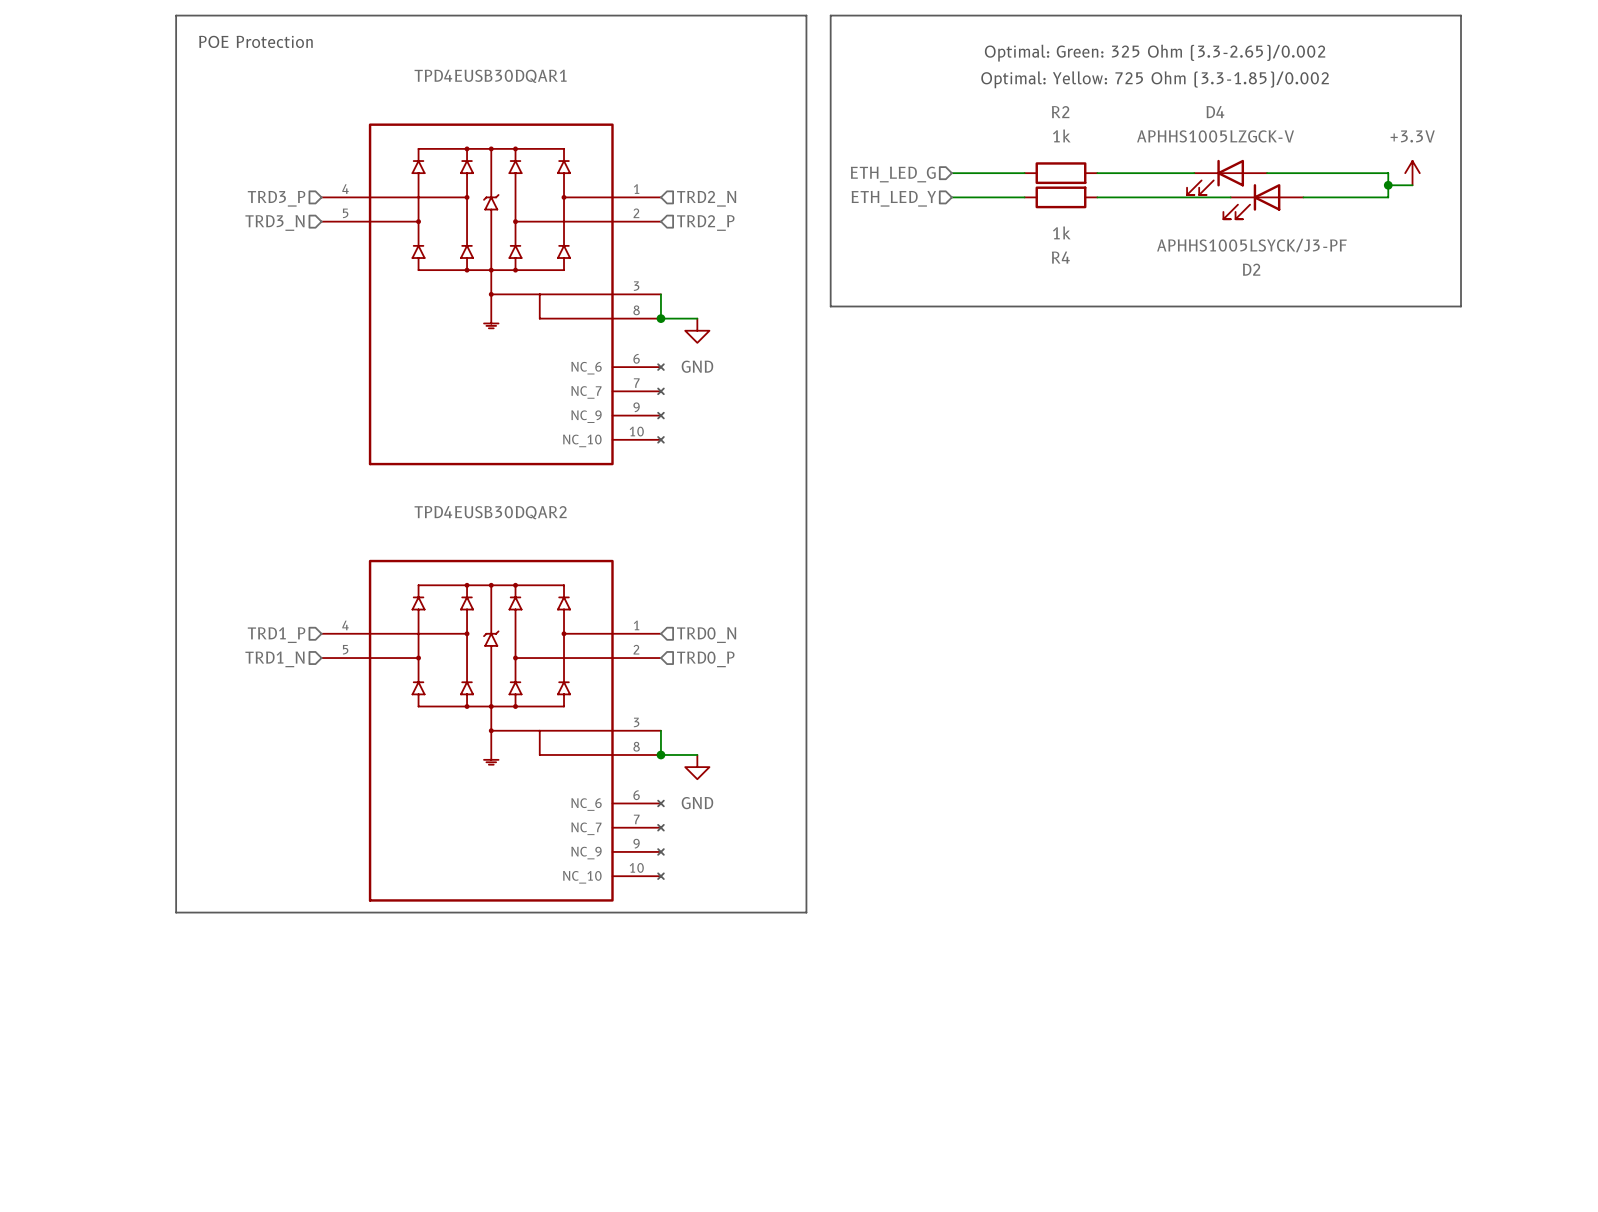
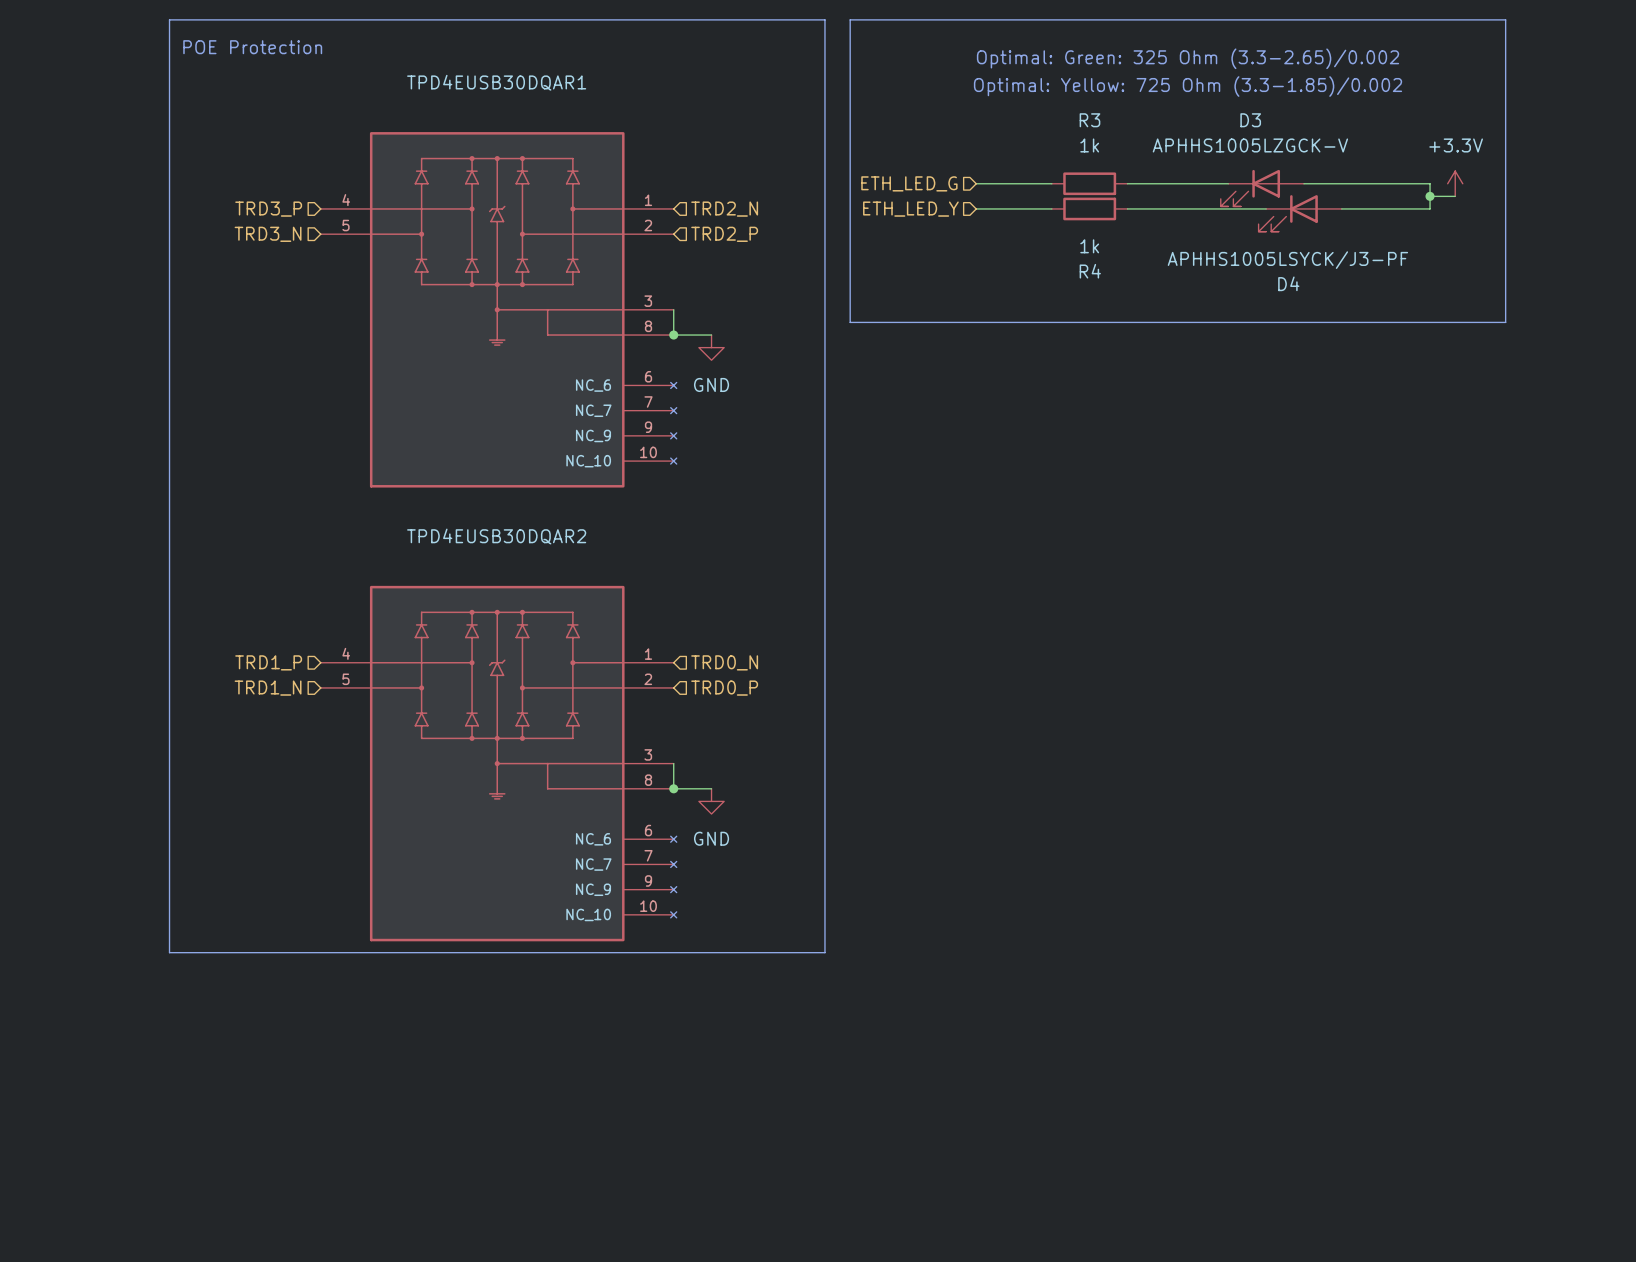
R2 name: R2 (1060, 112) -> R3 (1089, 120)
D4 name: D4 (1215, 112) -> D3 (1250, 120)
D2 name: D2 (1251, 269) -> D4 (1288, 283)

